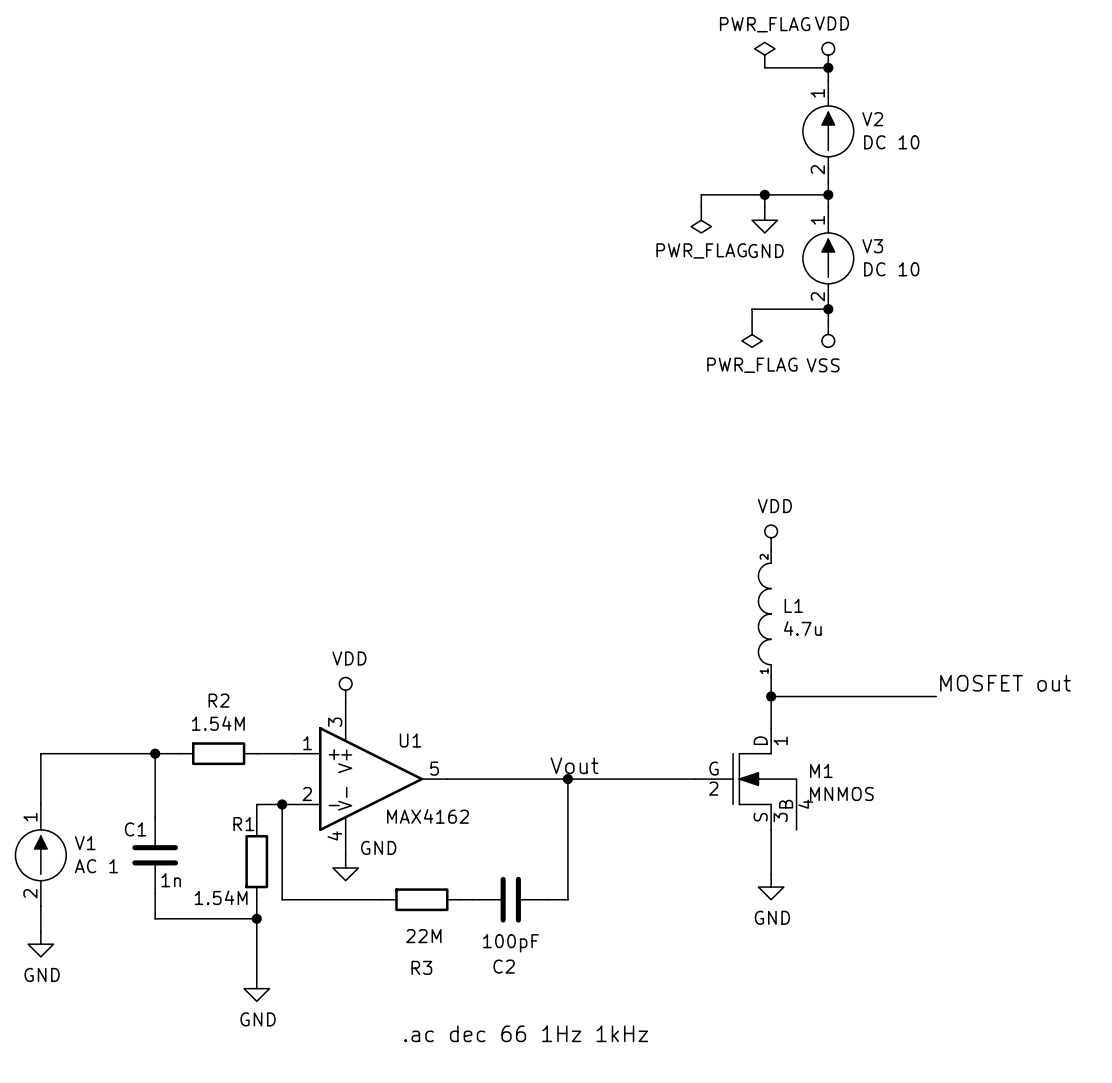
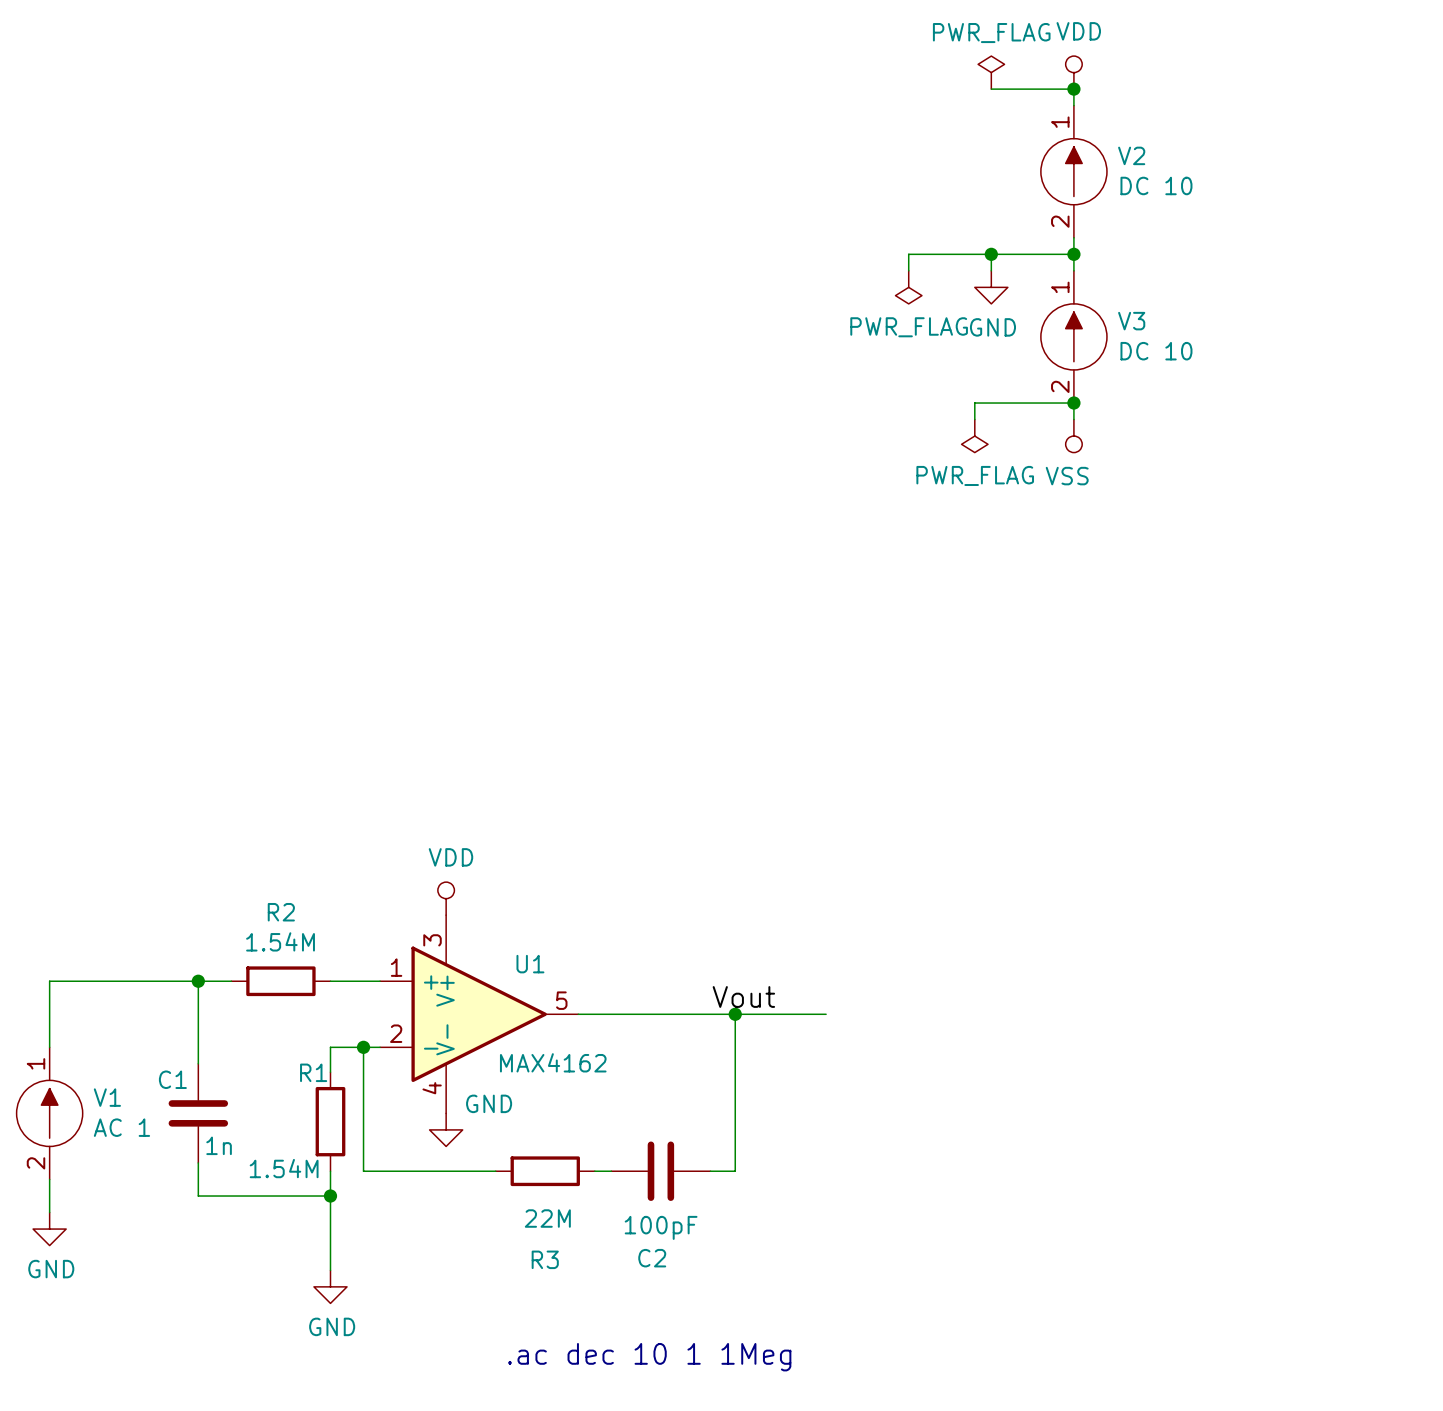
power symbol: VDD (771, 537) -> none
L1: 4.7u (764, 613) -> none
wire: (771, 677) (771, 728) -> none
label: MOSFET out (1005, 683) -> none
wire: (771, 696) (936, 696) -> none
junction: (771, 696) -> none
wire: (637, 779) (694, 779) -> none
M1: MNMOS (745, 779) -> none
wire: (771, 829) (771, 874) -> none
power symbol: GND (771, 887) -> none
text: .ac dec 66 1Hz 1kHz (526, 1033) -> none
text: none -> .ac dec 10 1 1Meg (649, 1357)

